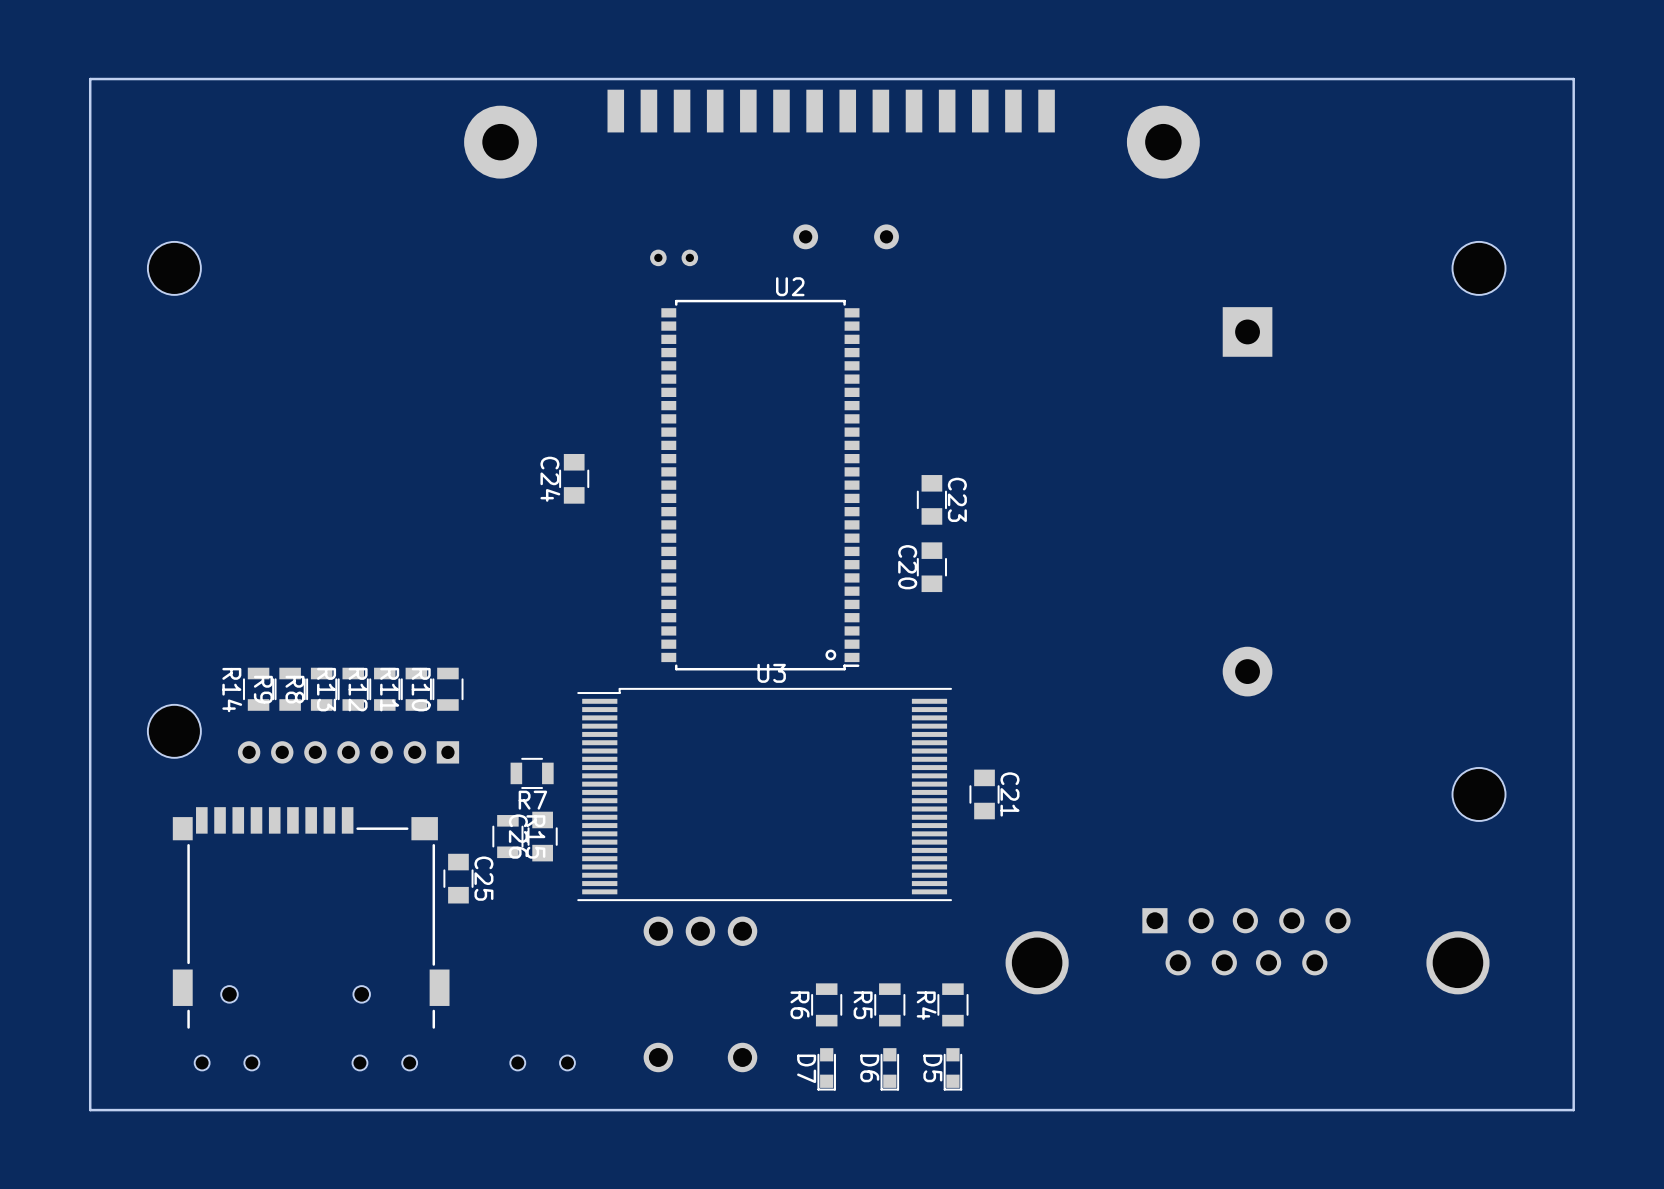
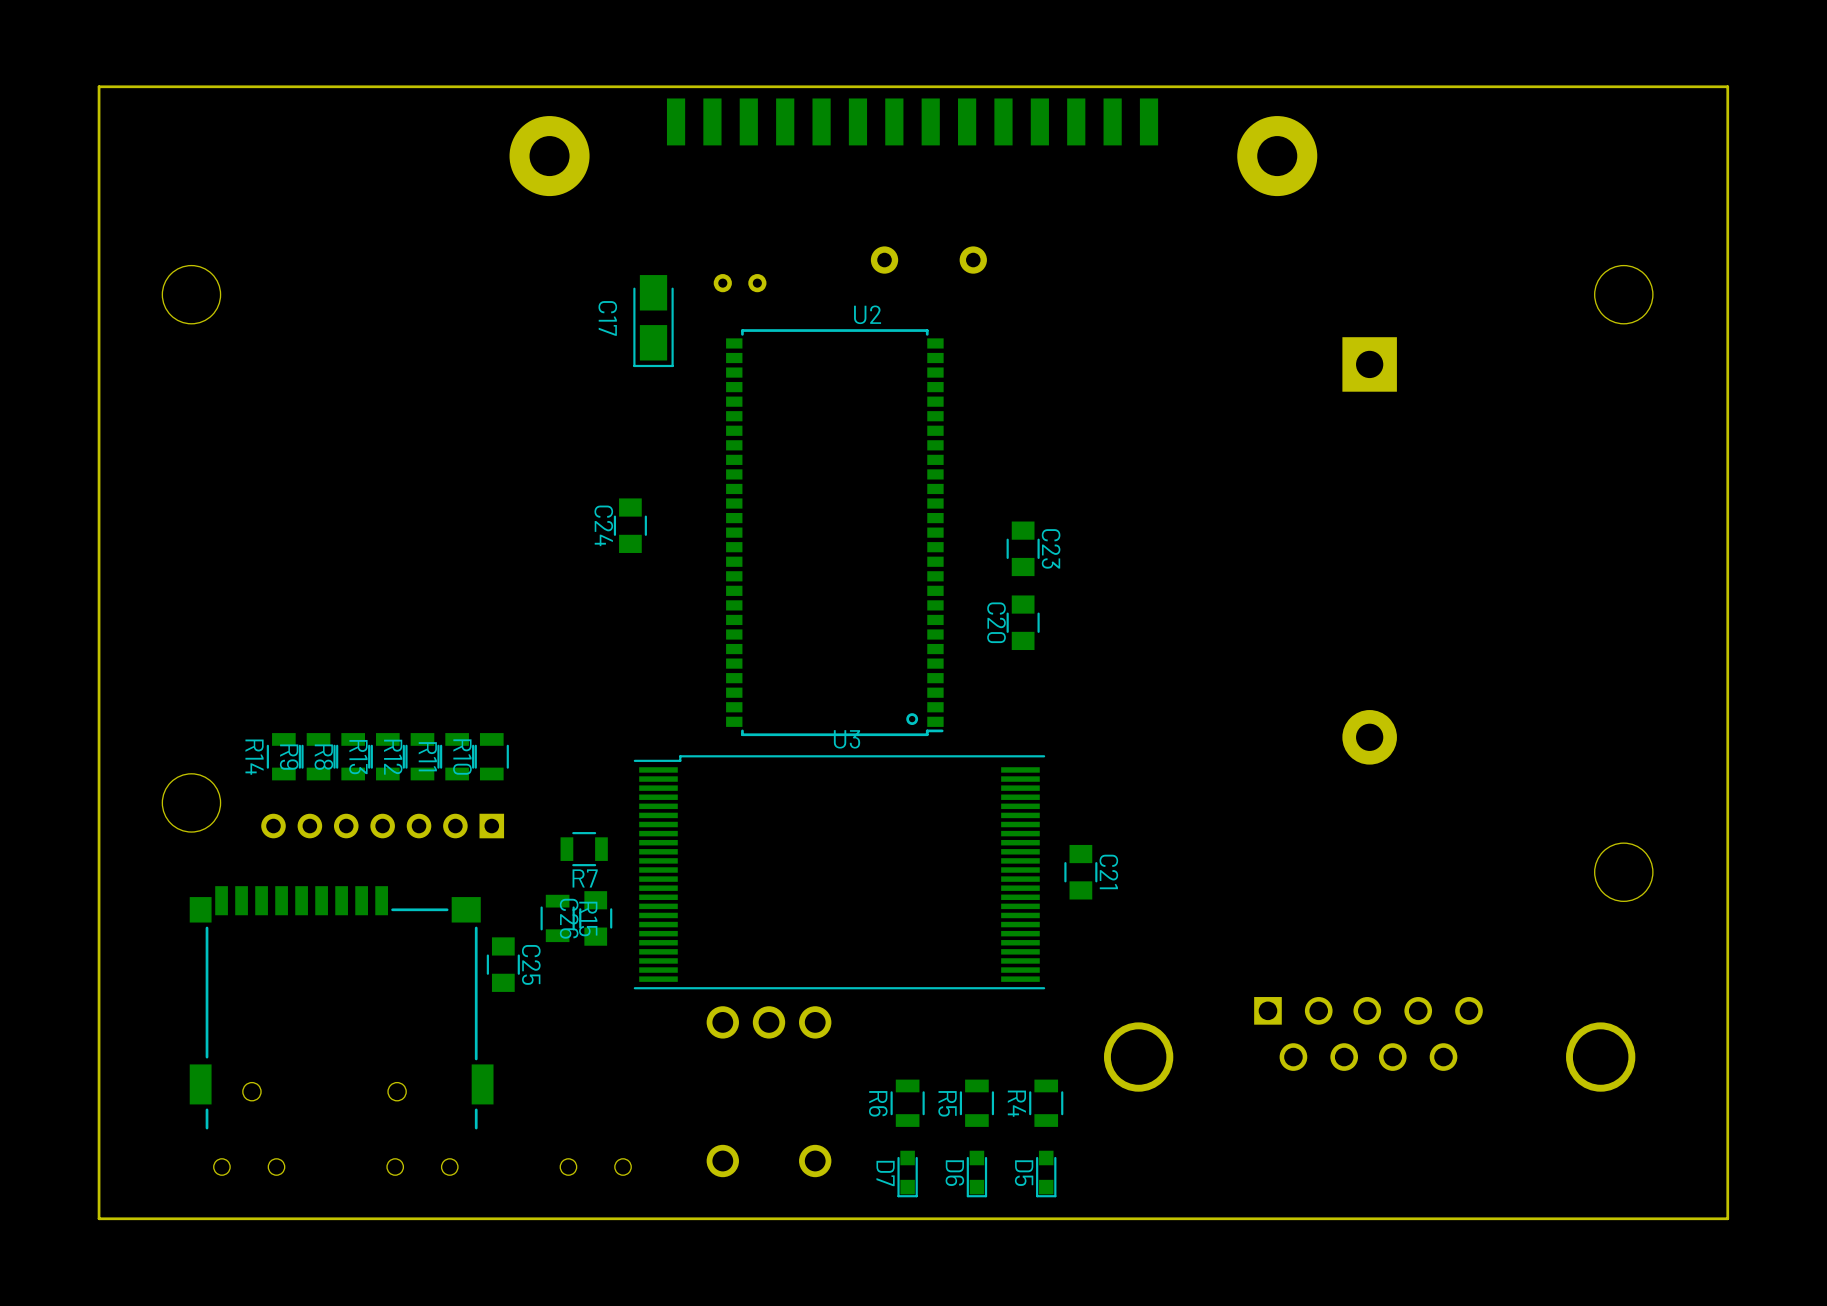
C17: none -> (653, 321)

